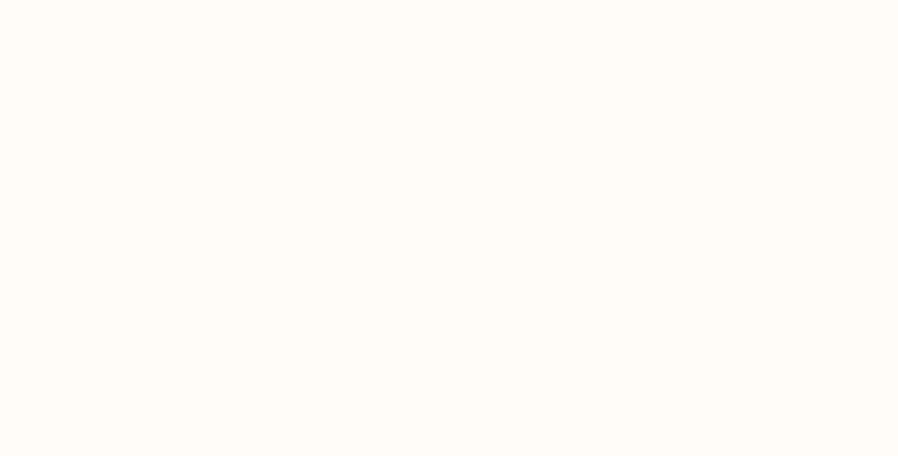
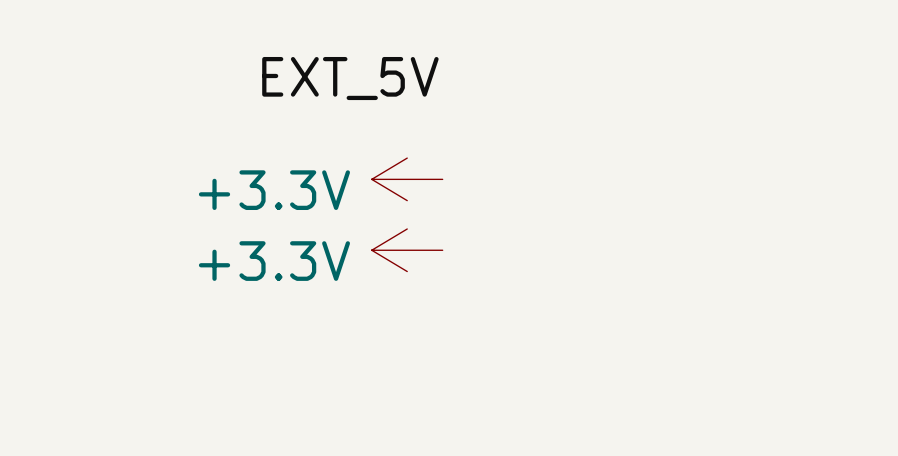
label: none -> EXT_5V (350, 78)
power symbol: none -> +3.3V (407, 179)
power symbol: none -> +3.3V (407, 250)

